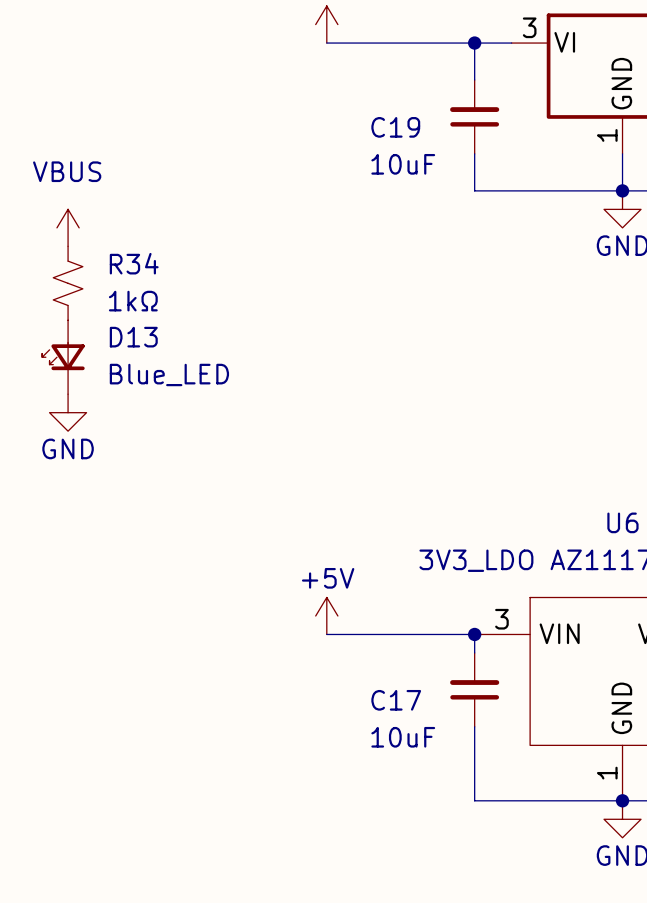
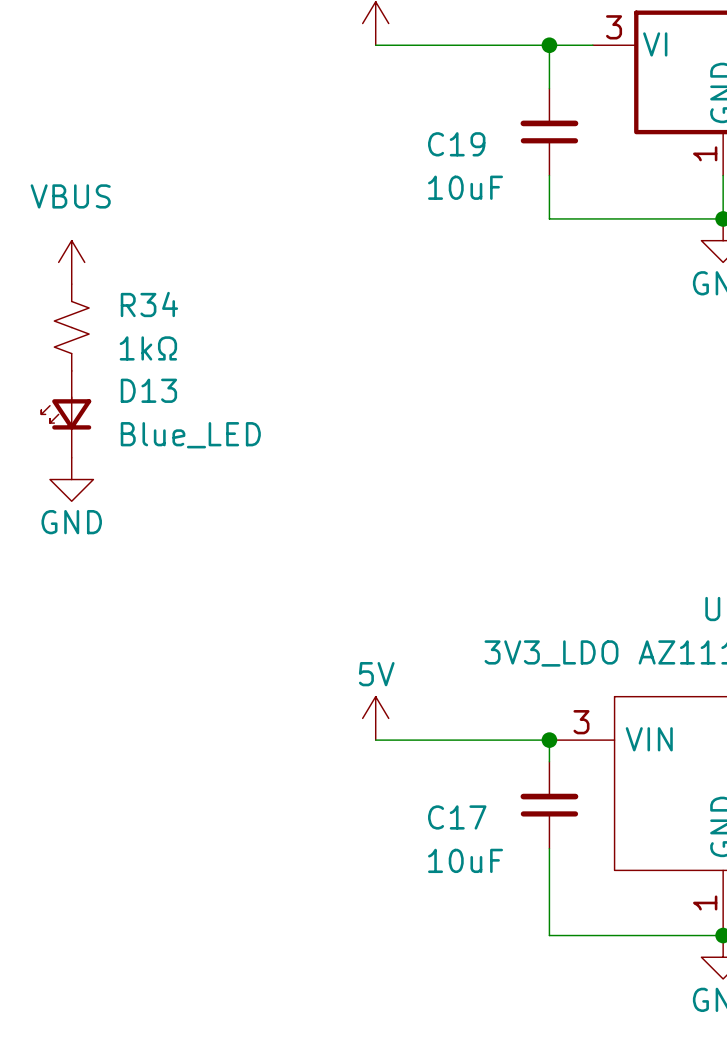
power symbol: +5V (326, 615) -> 5V (375, 718)

